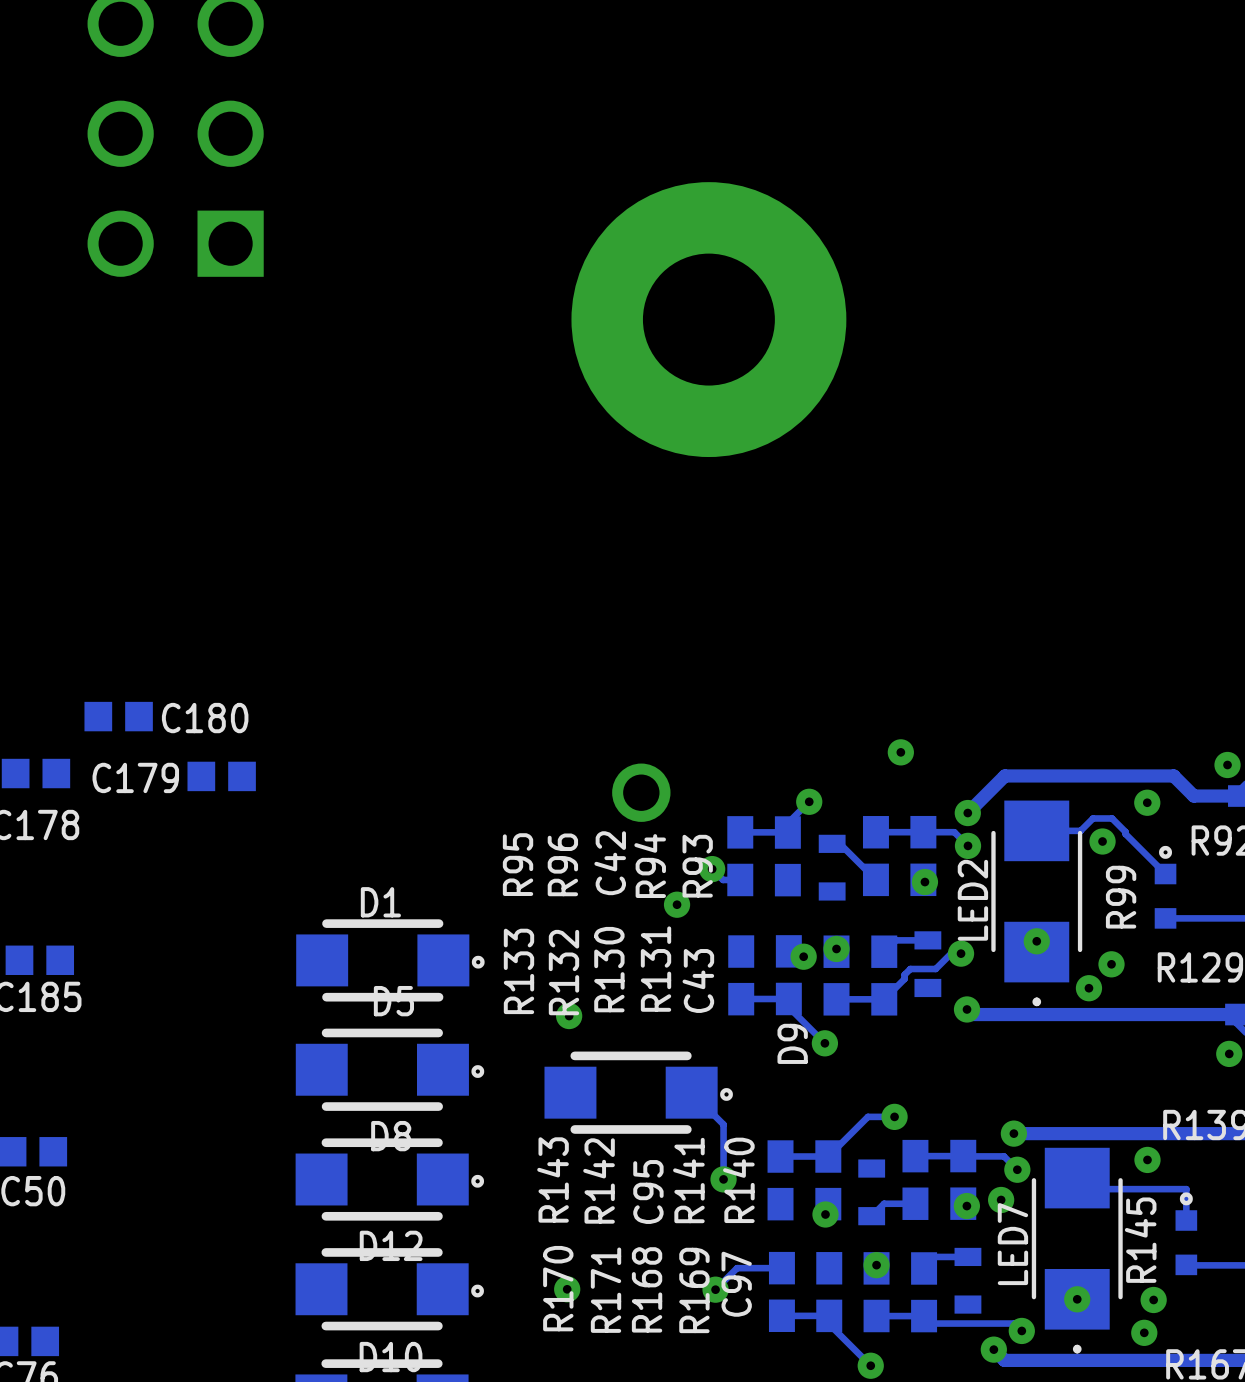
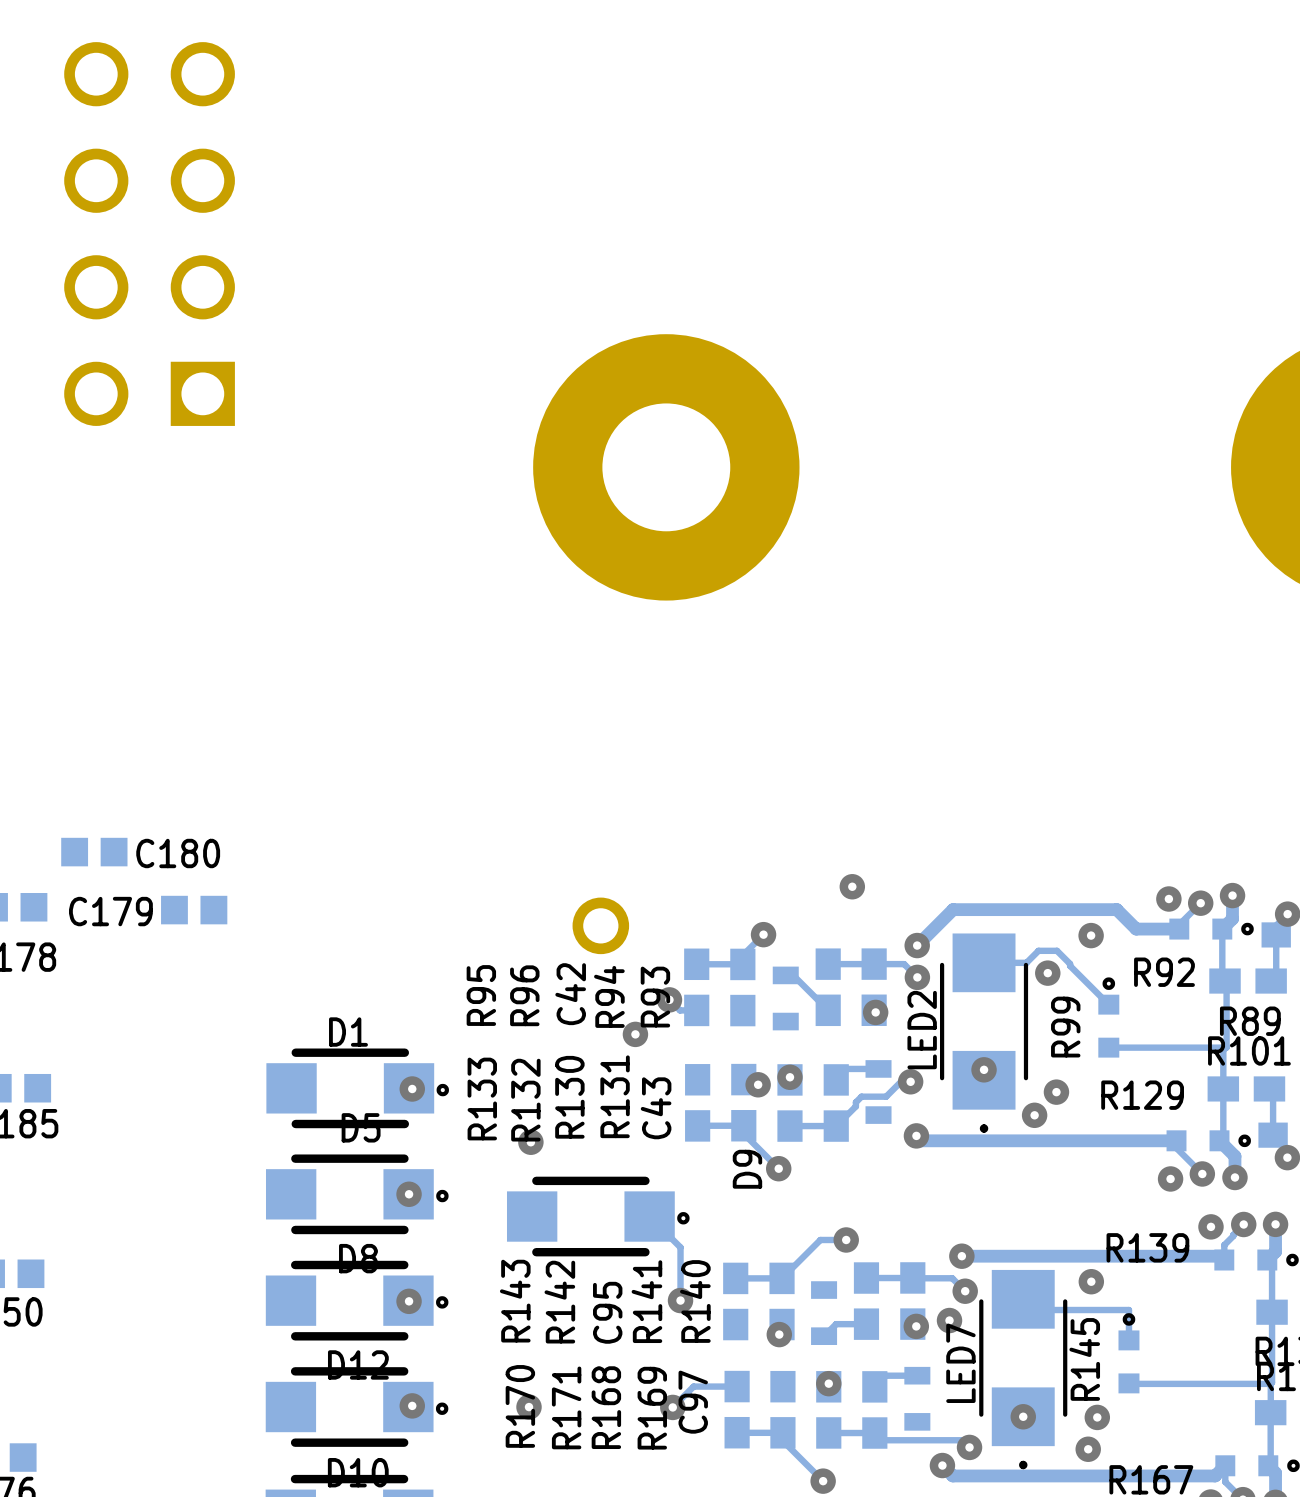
via: none -> (412, 1088)
via: none -> (409, 1194)
via: none -> (409, 1301)
via: none -> (412, 1405)

